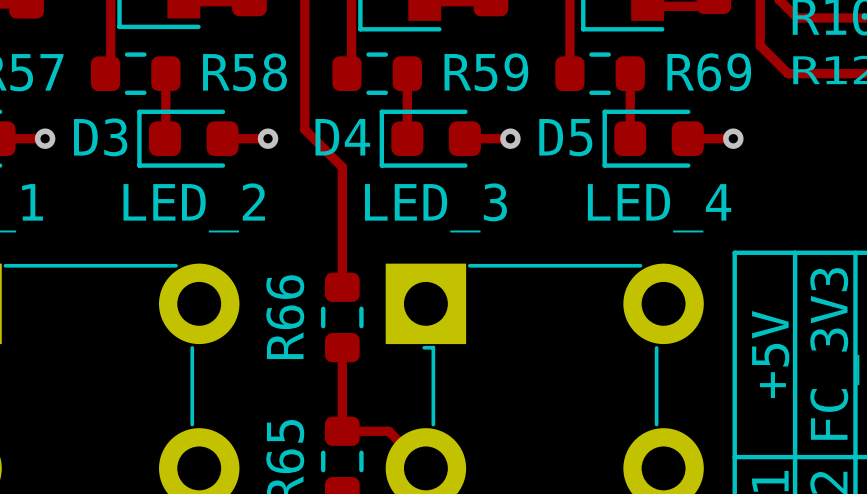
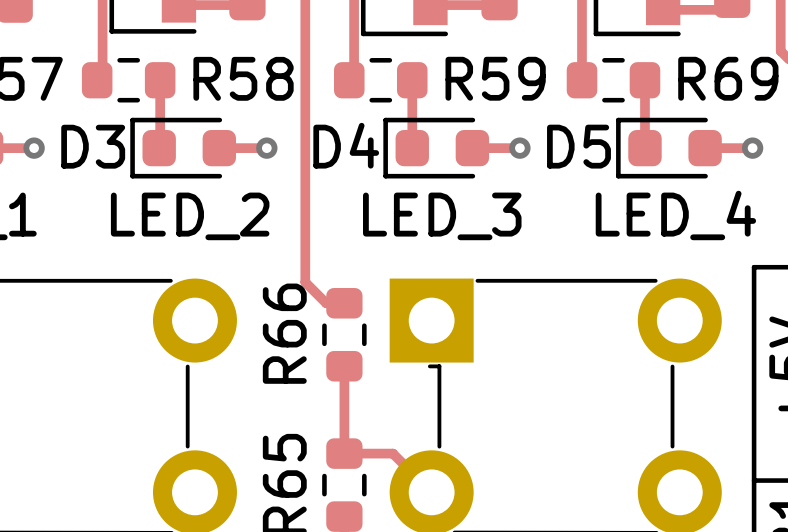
top track: (304, 129) (342, 167) (342, 287) -> (305, 138) (305, 282) (326, 303) (344, 303)

